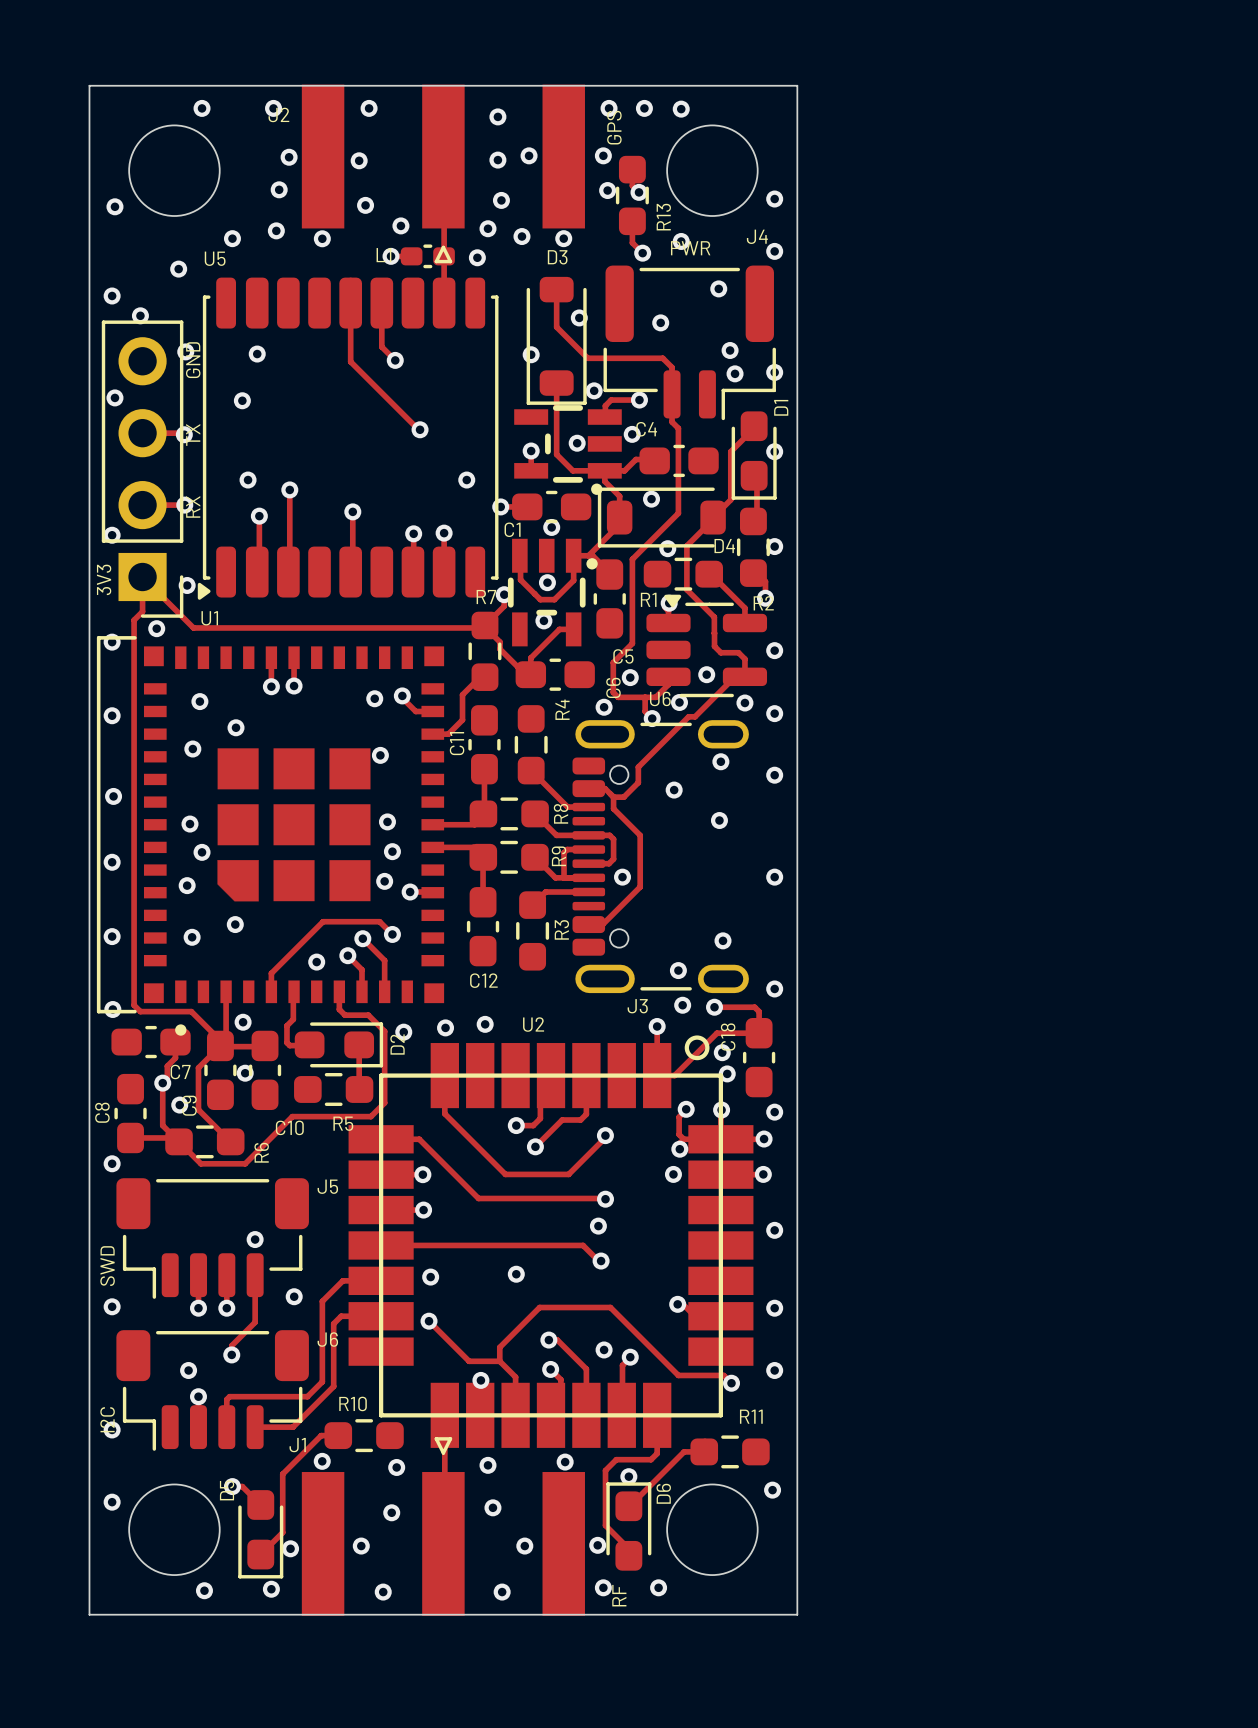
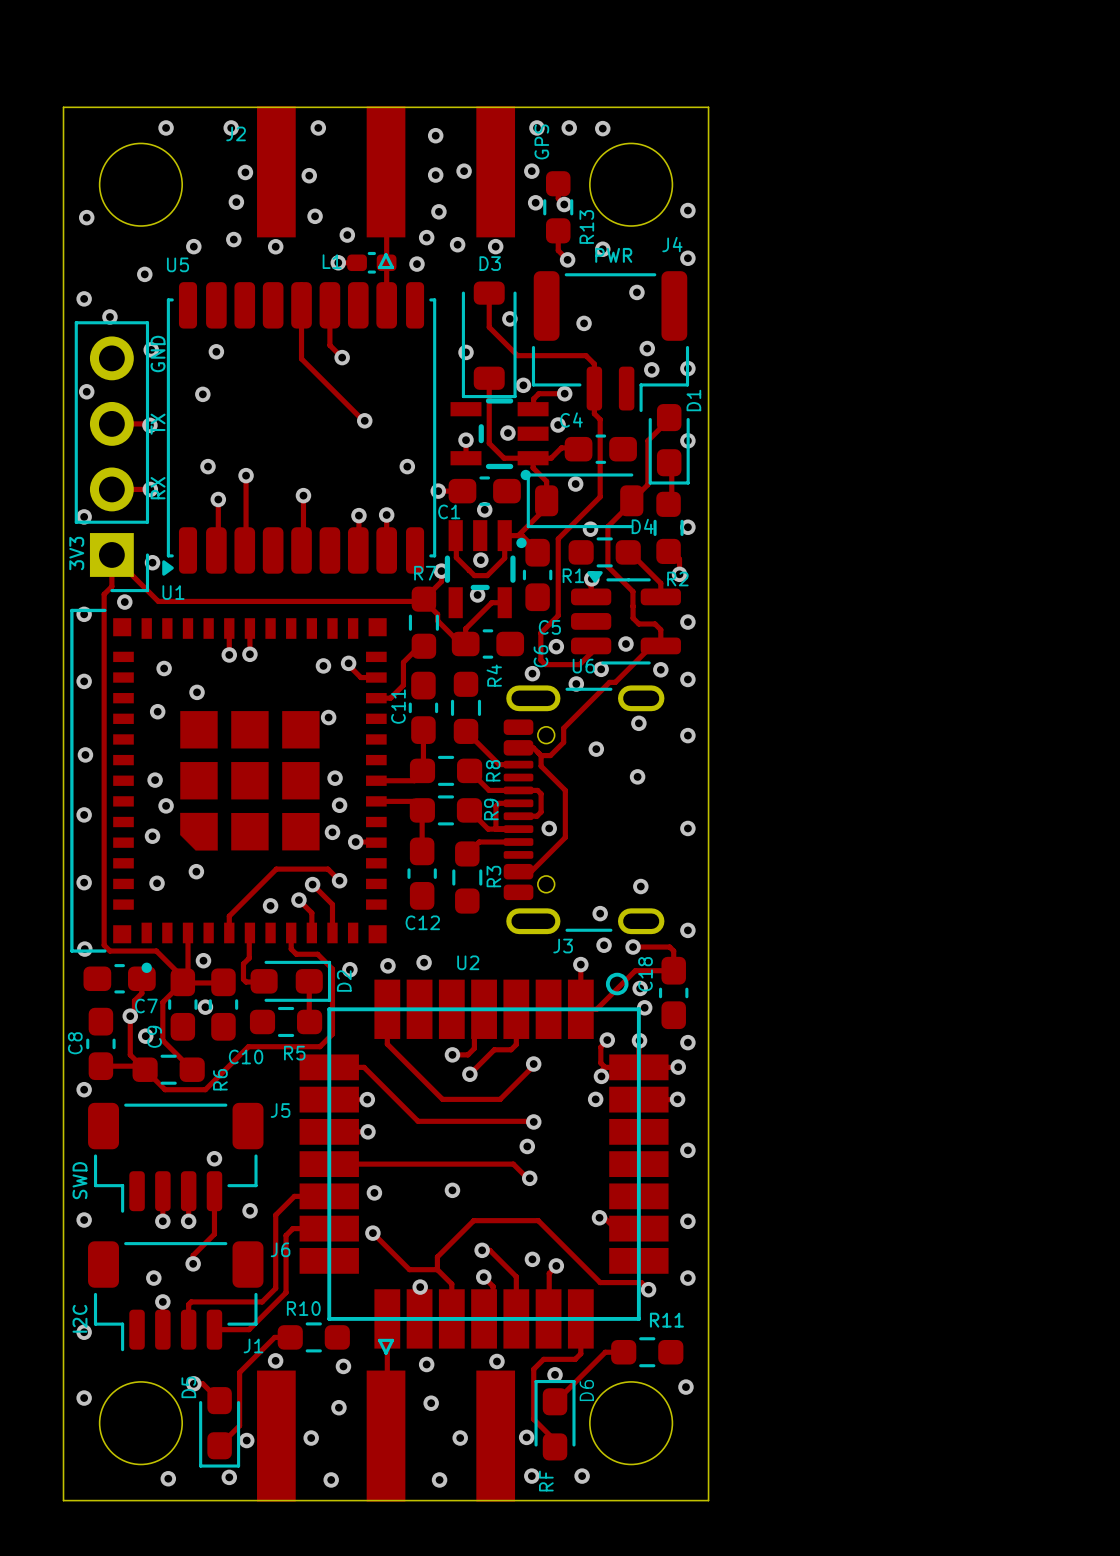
track: (645, 697) (645, 711) (651, 717) -> none

